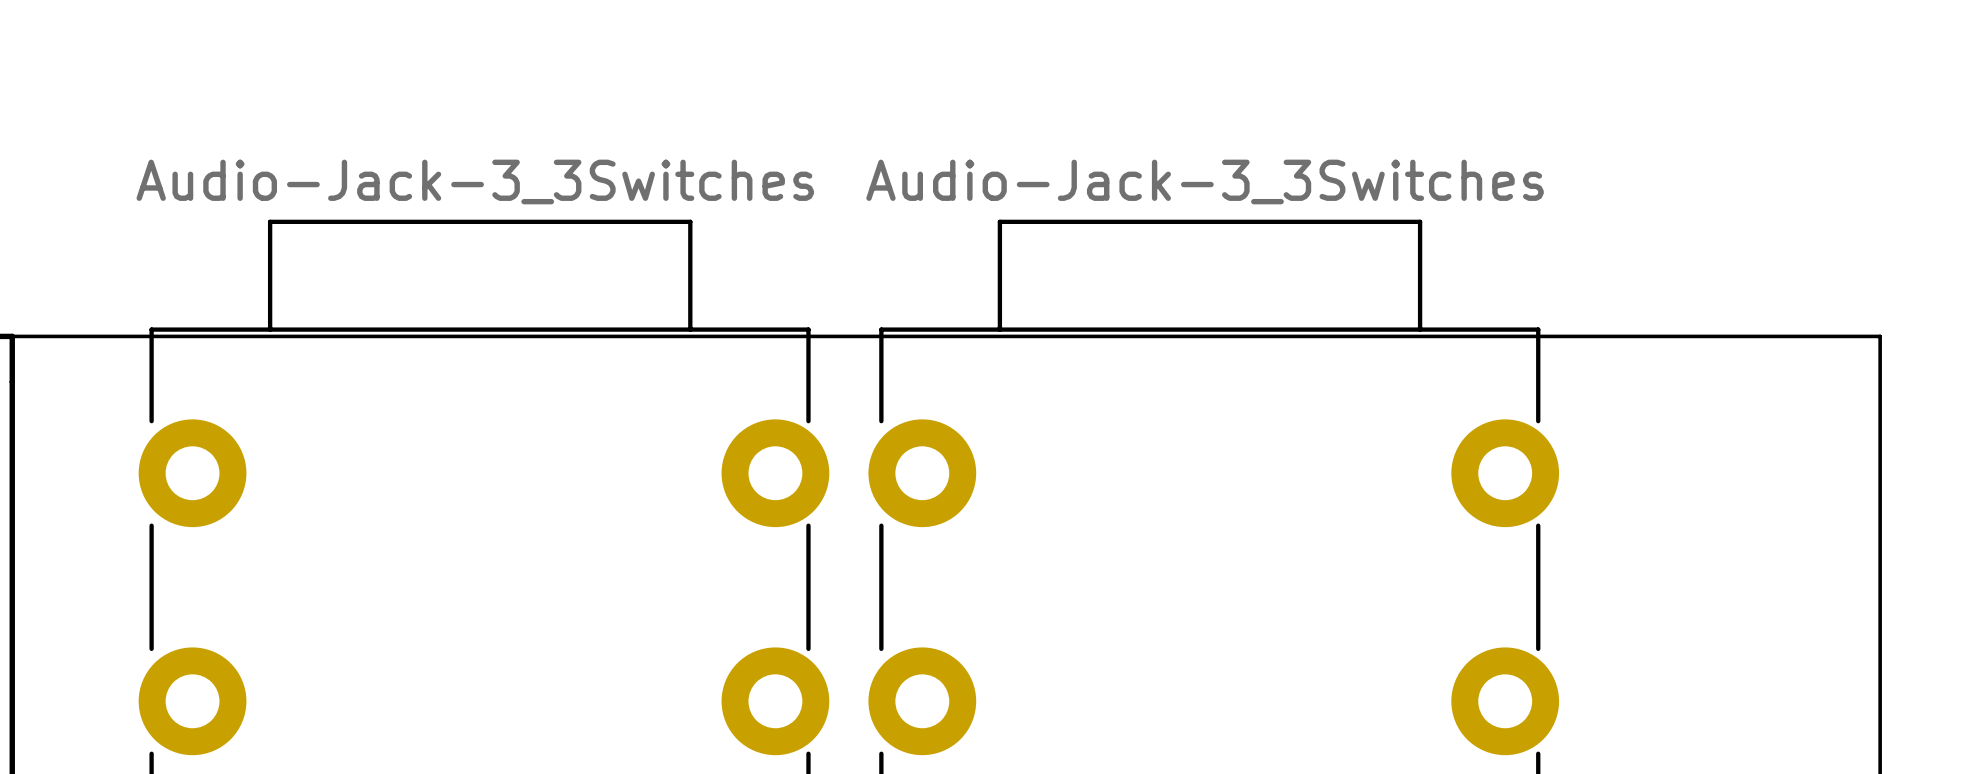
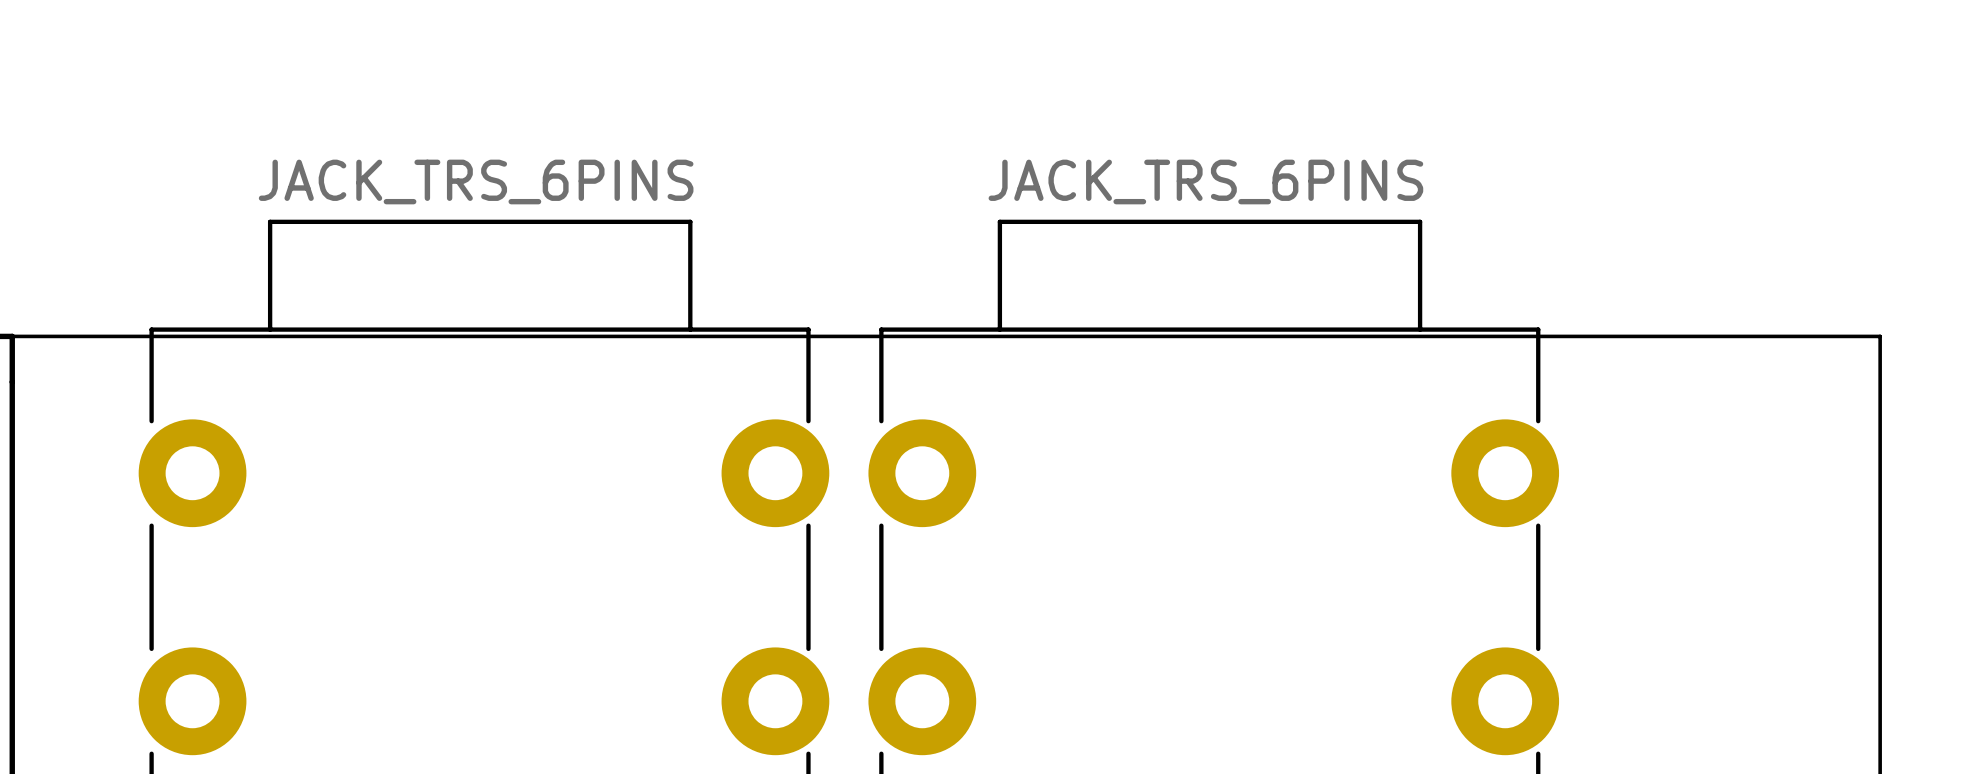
part value: Audio-Jack-3_3Switches (475, 181) -> JACK_TRS_6PINS (476, 181)
part value: Audio-Jack-3_3Switches (1205, 181) -> JACK_TRS_6PINS (1205, 181)

